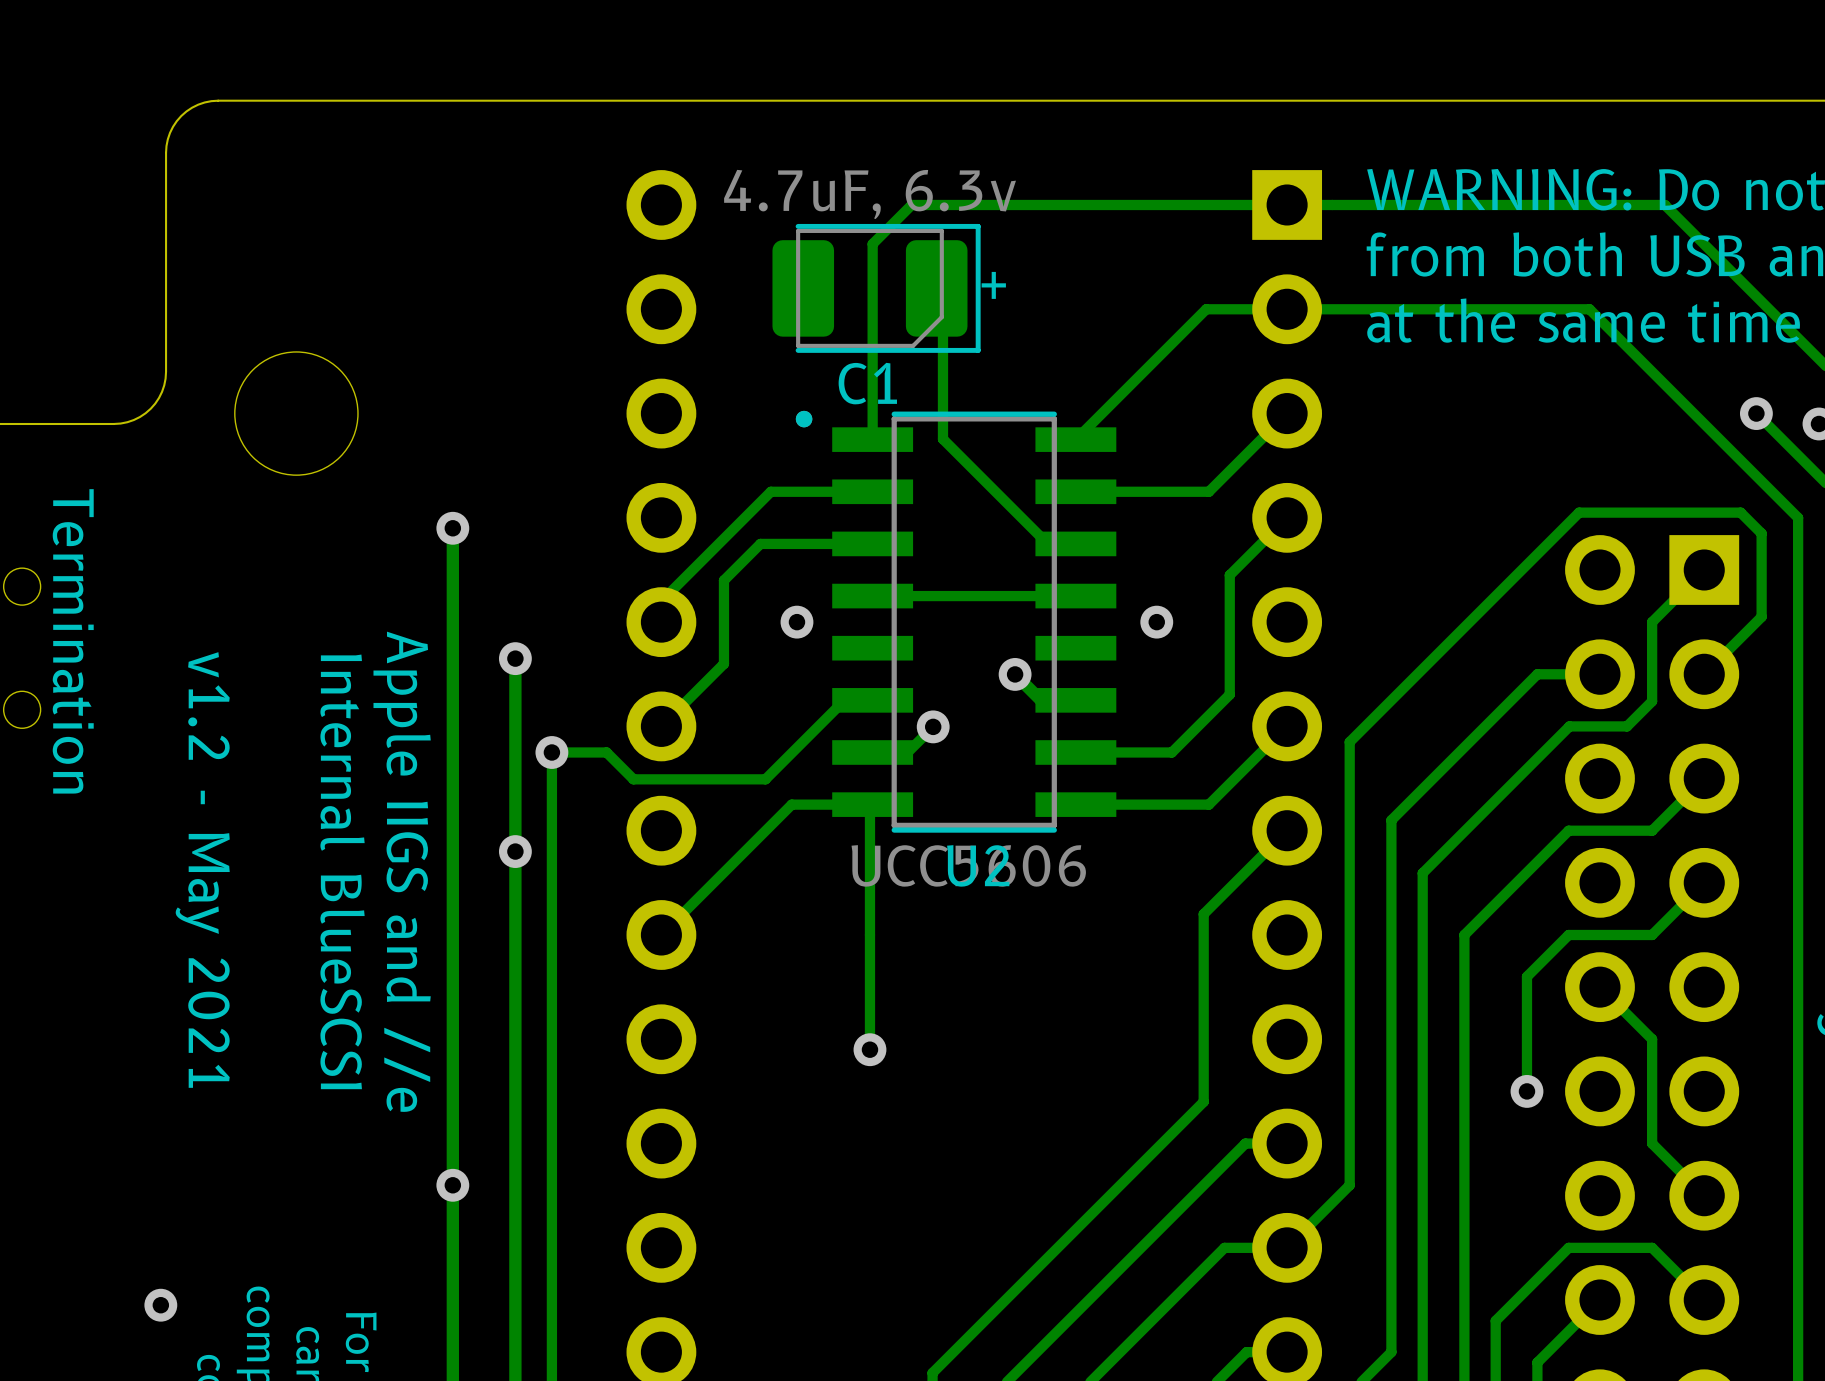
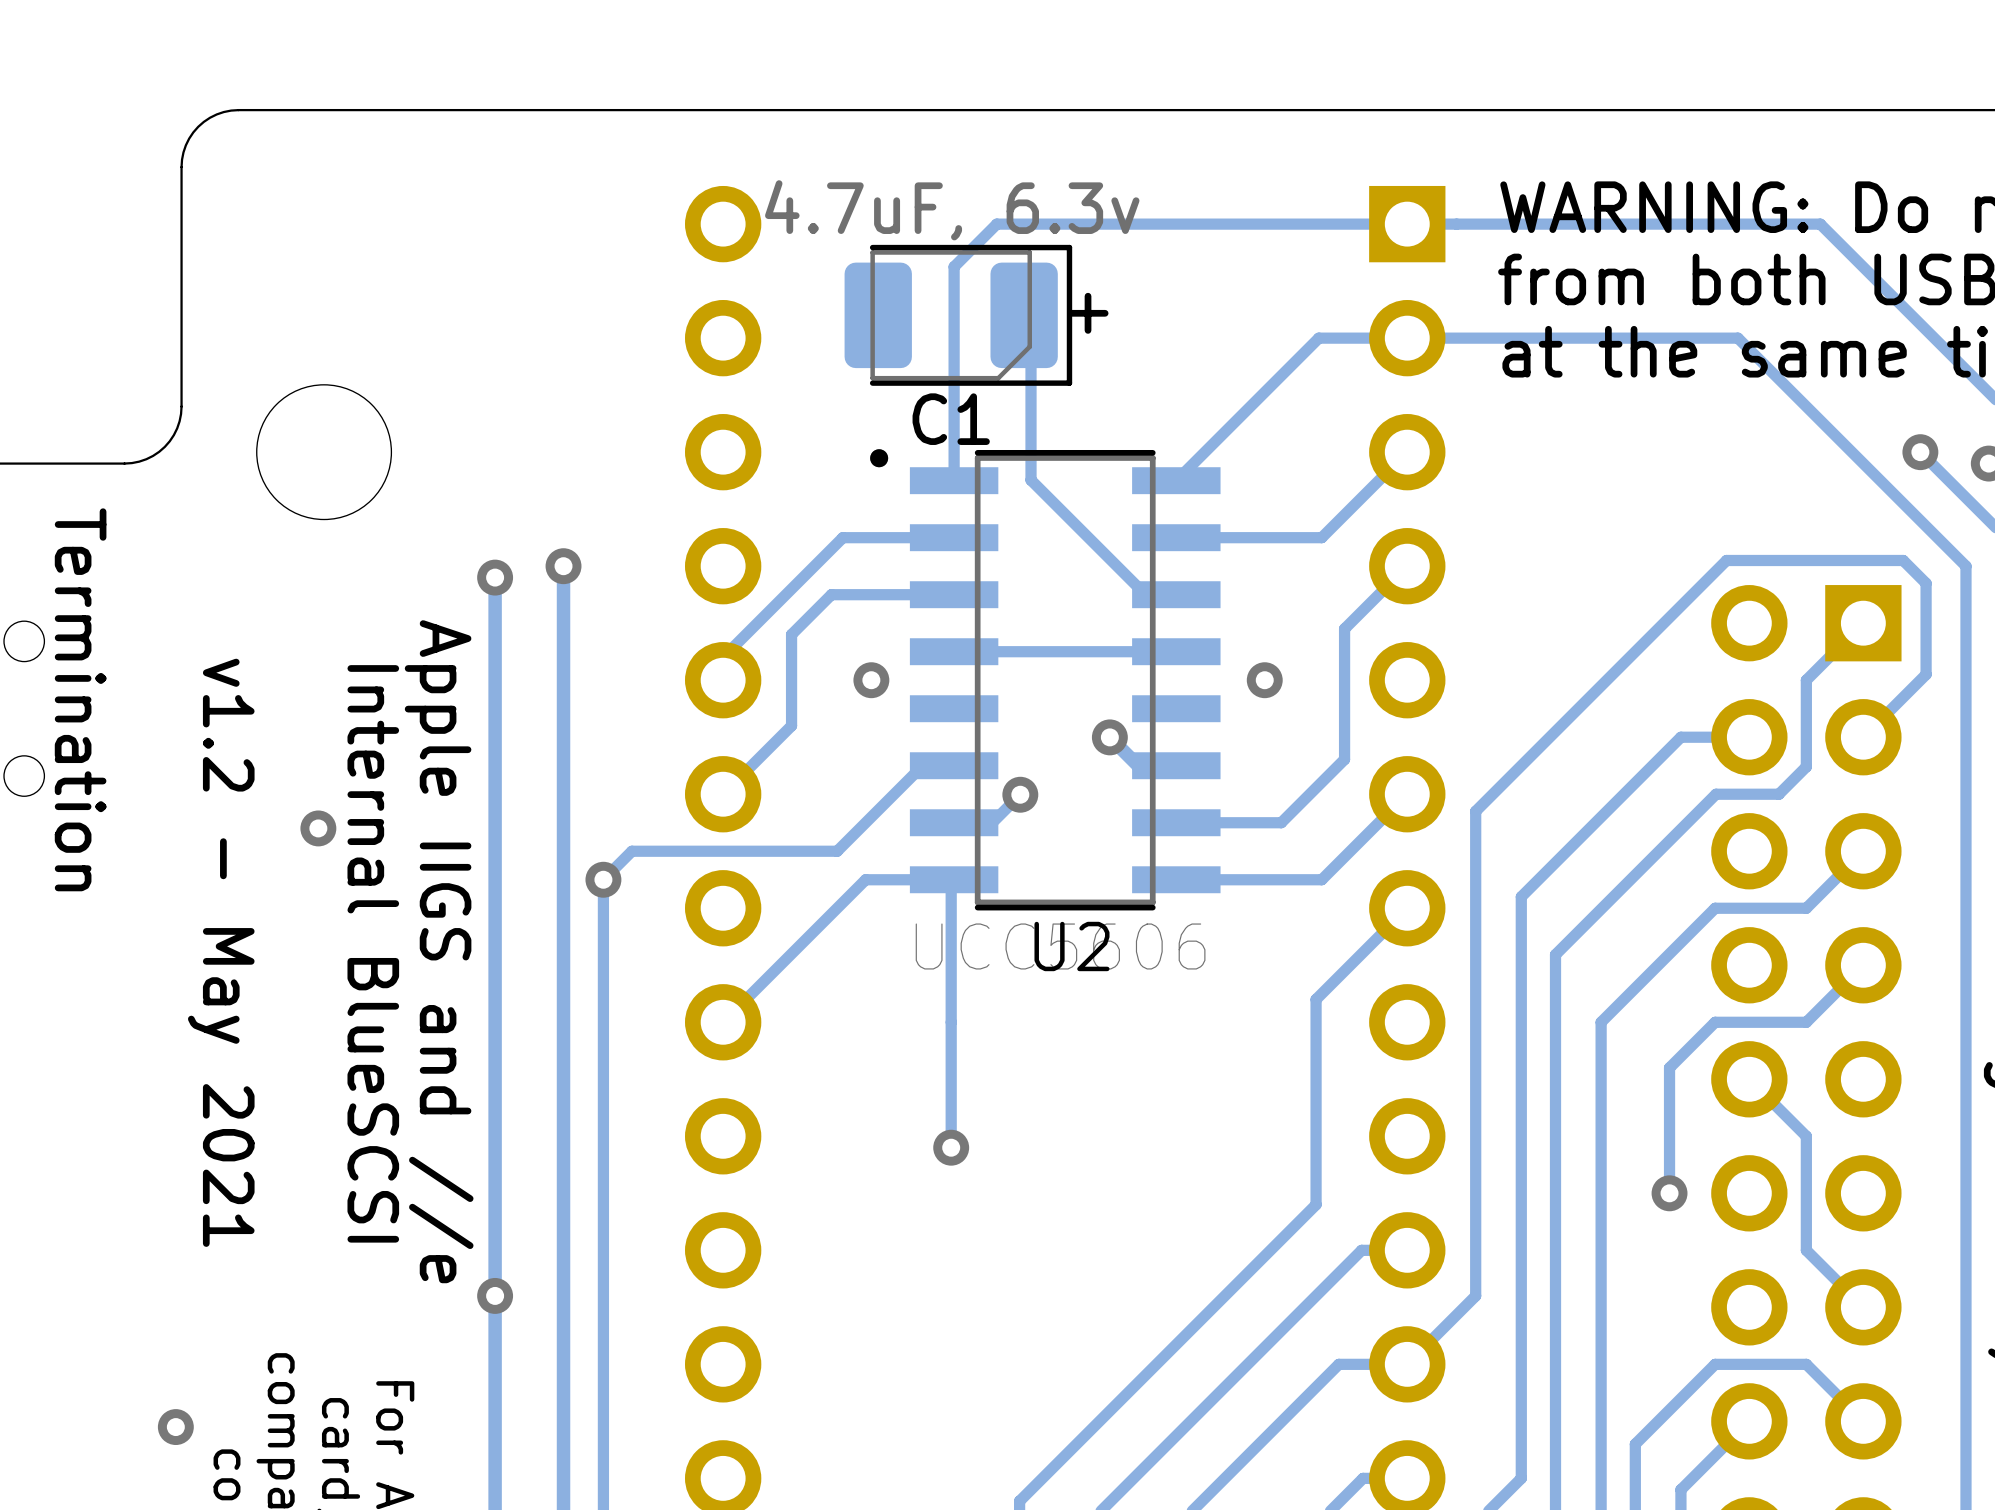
track: none -> (563, 566) (563, 720)
via: none -> (563, 566)
via: (515, 658) -> none
track: (844, 700) (765, 779) (633, 779) (606, 752) (551, 752) (551, 804) -> (922, 765) (837, 851) (631, 851) (603, 879)
via: (551, 752) -> none
via: none -> (318, 828)
via: none -> (603, 879)
via: (515, 851) -> none

